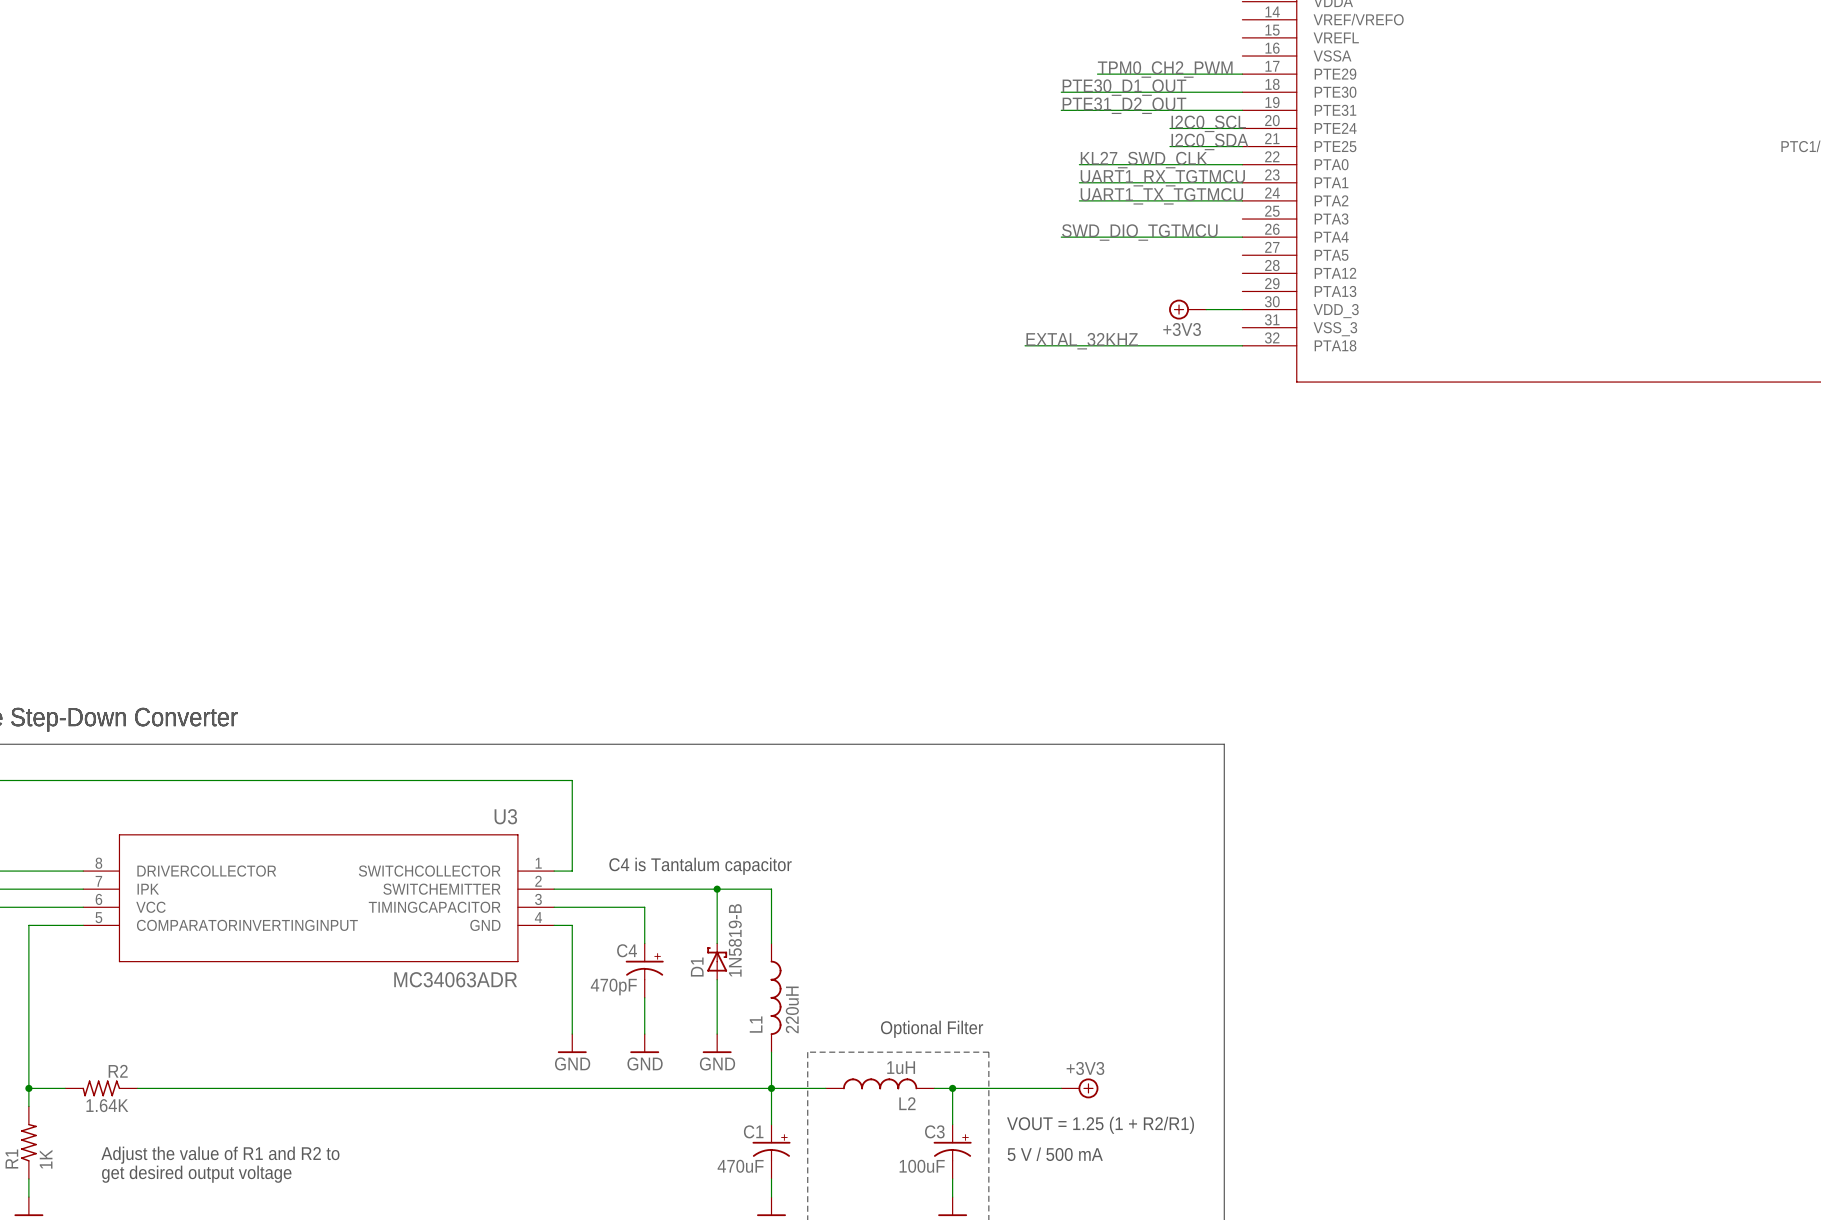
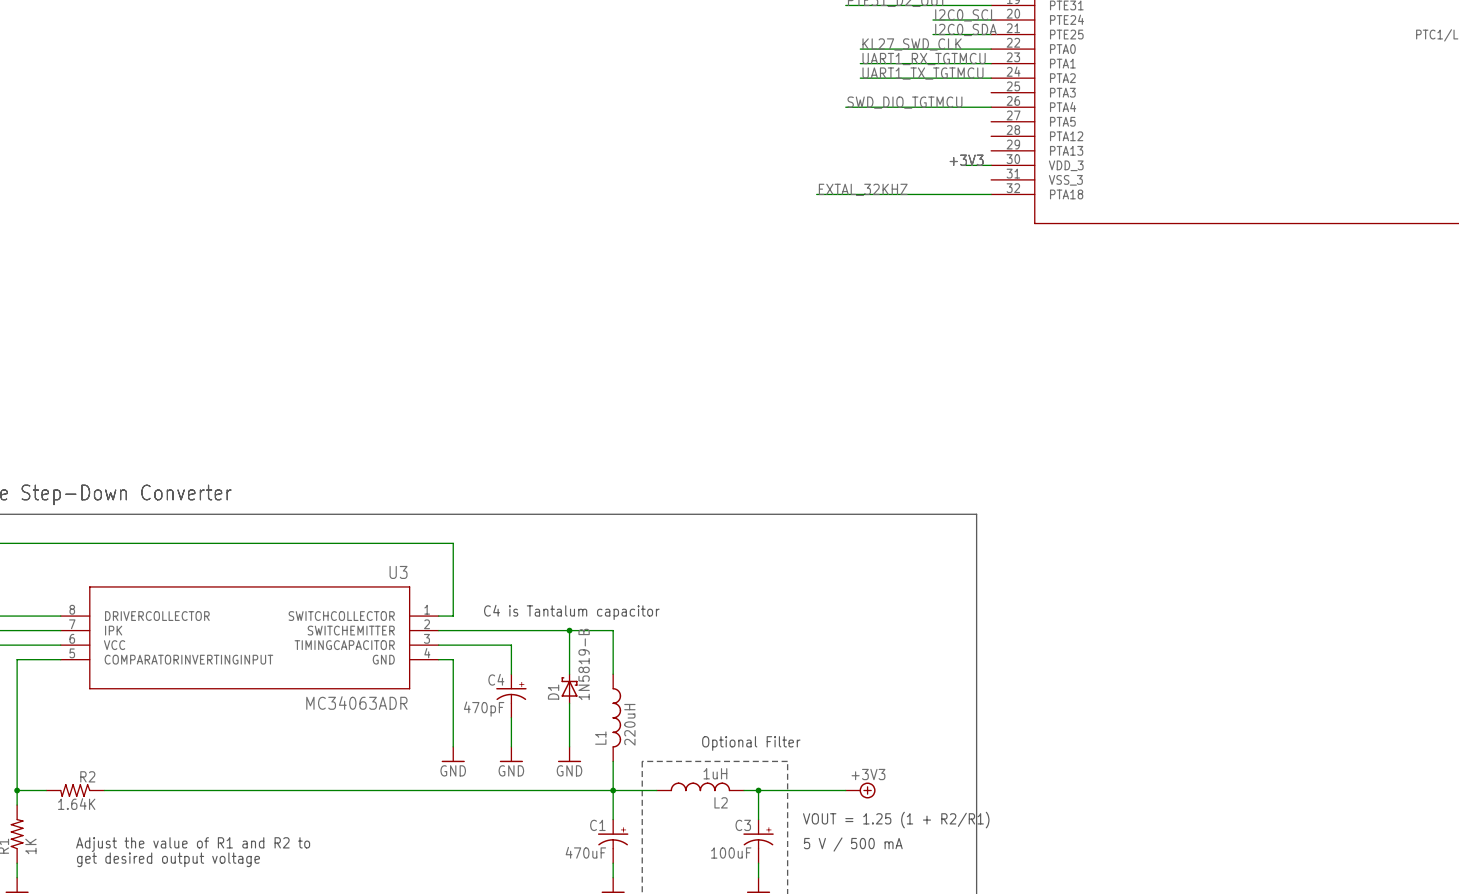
label: none -> +3V3 (966, 160)
power symbol: +3V3 (1187, 309) -> none

